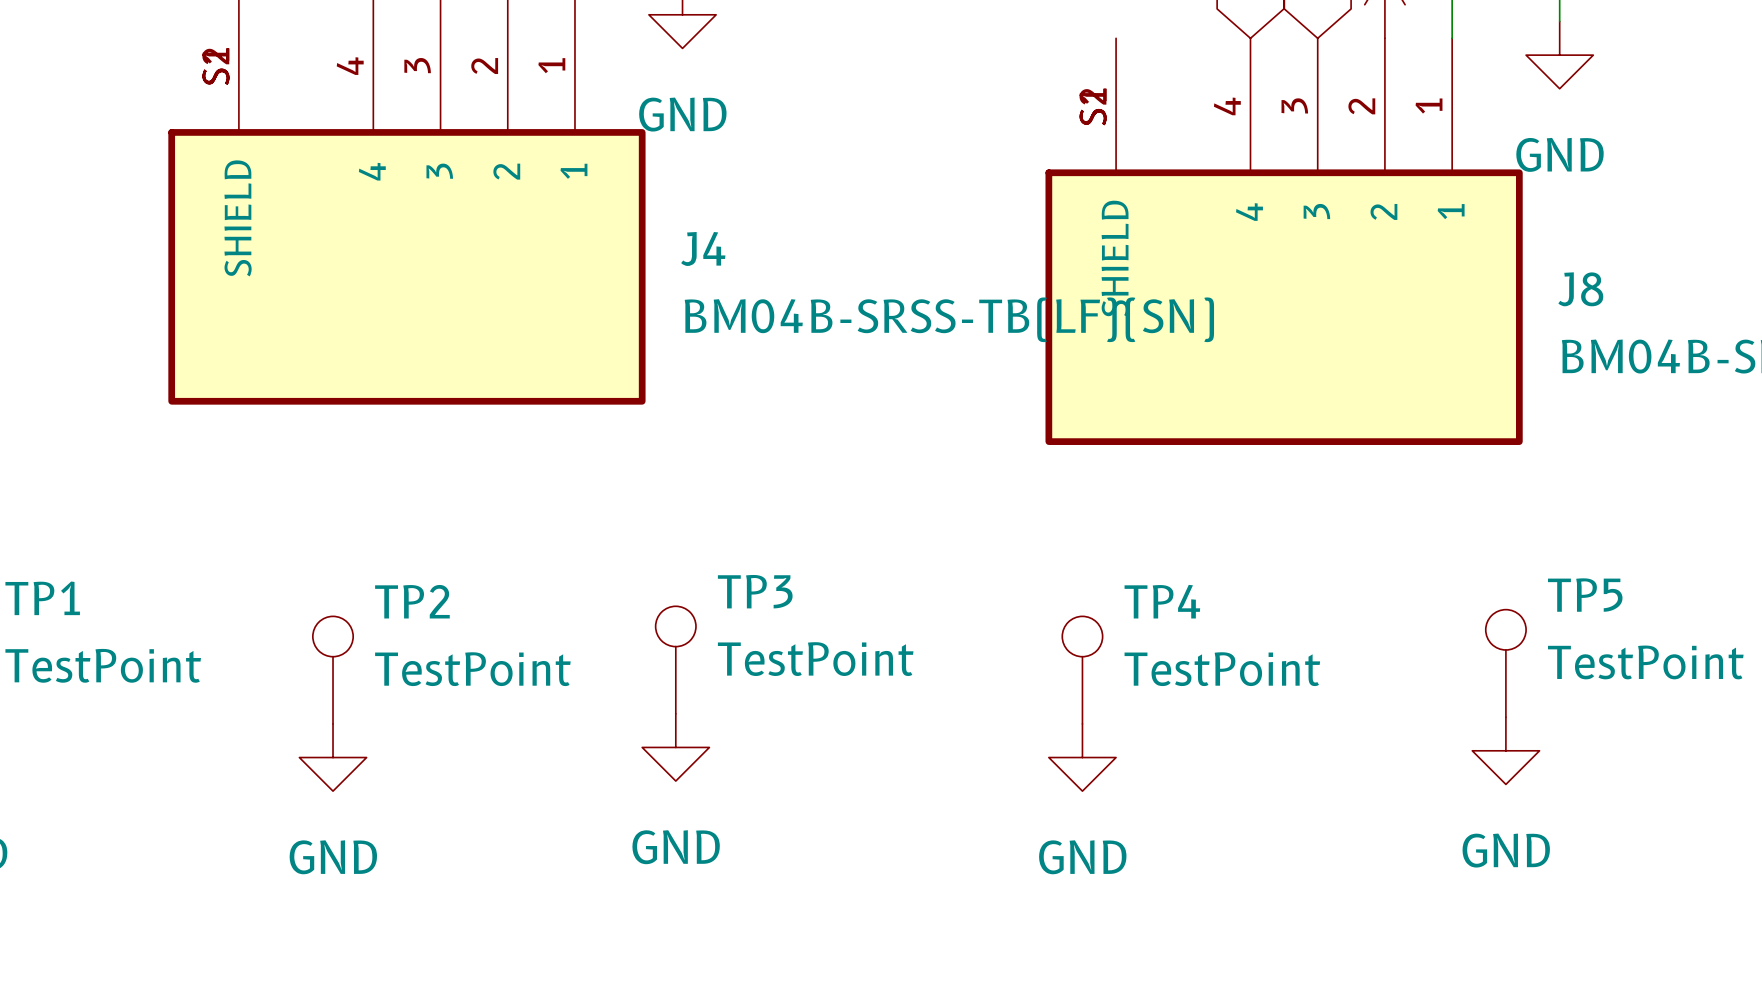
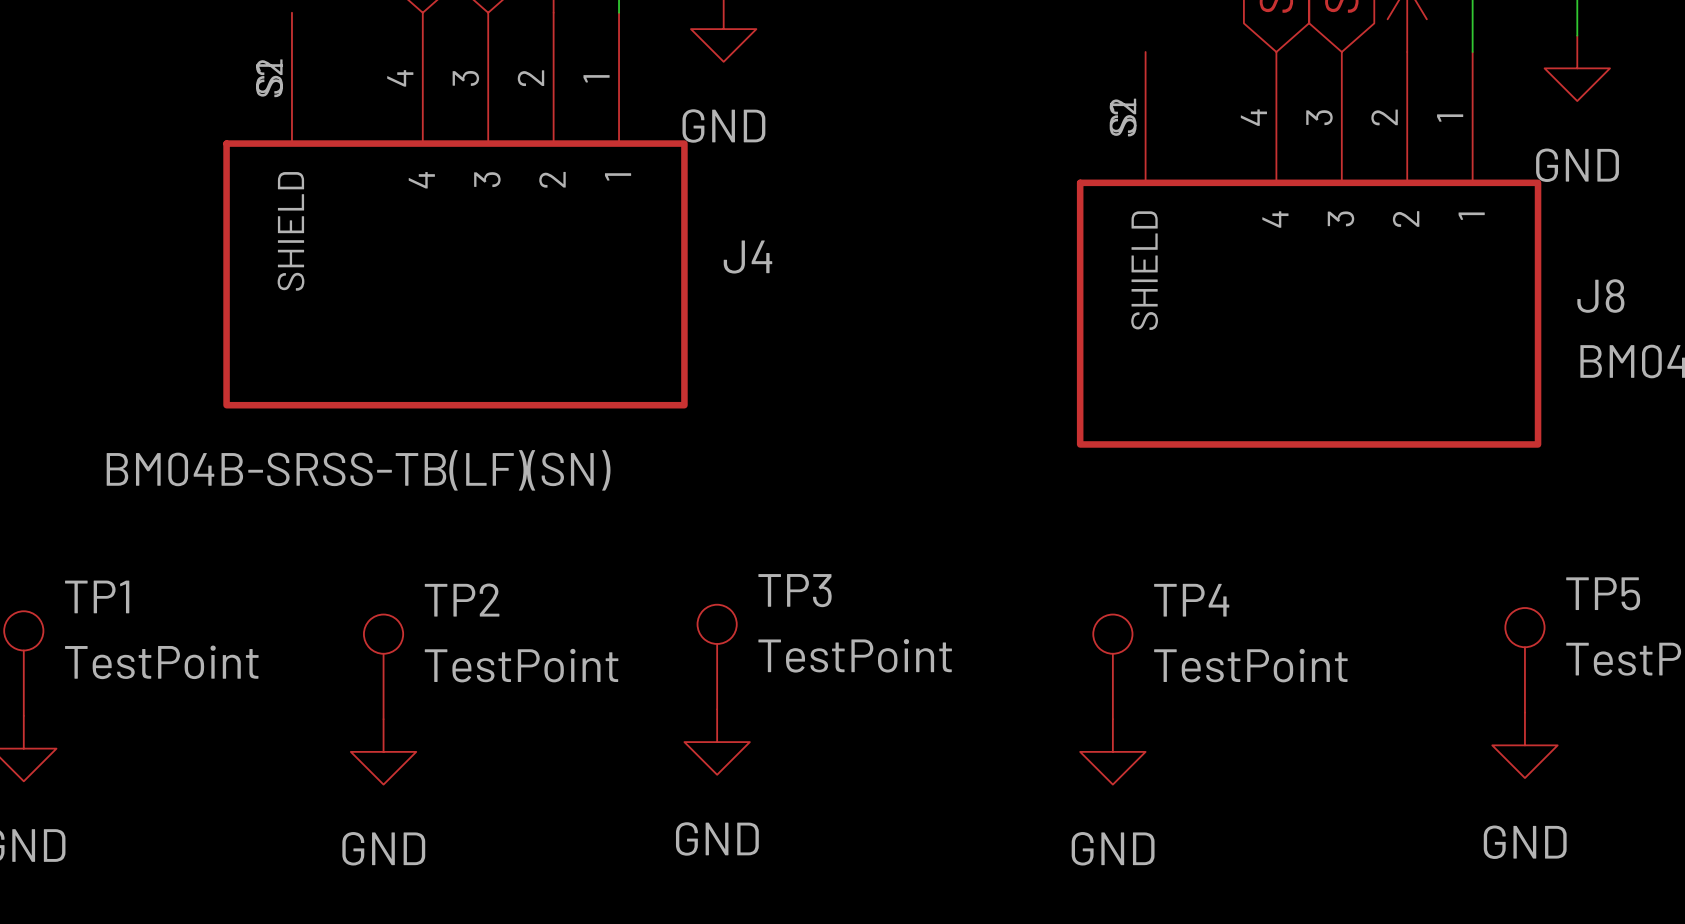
J4 value position: BM04B-SRSS-TB(LF)(SN) (949, 319) -> BM04B-SRSS-TB(LF)(SN) (358, 470)

